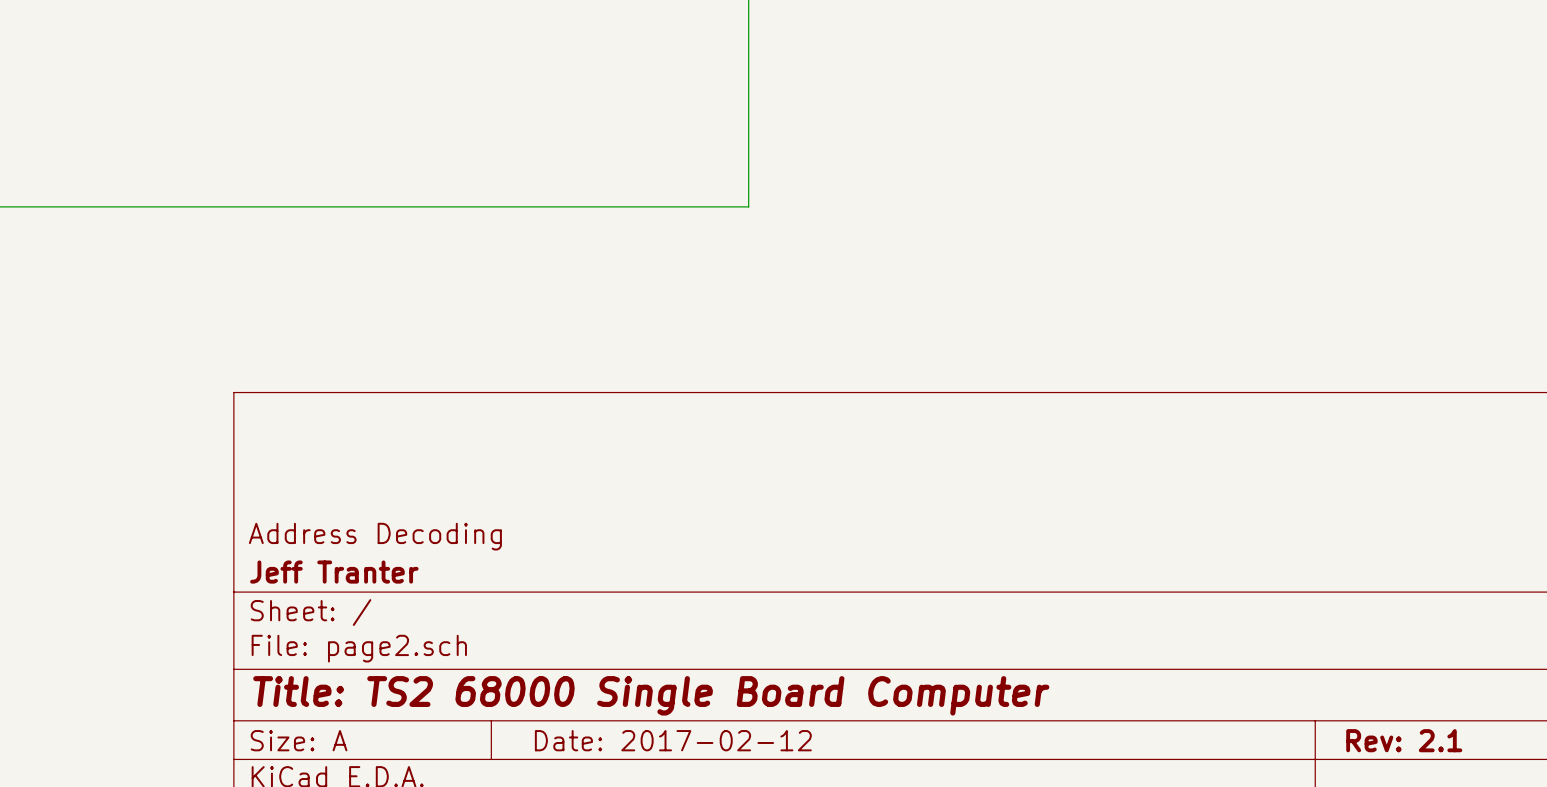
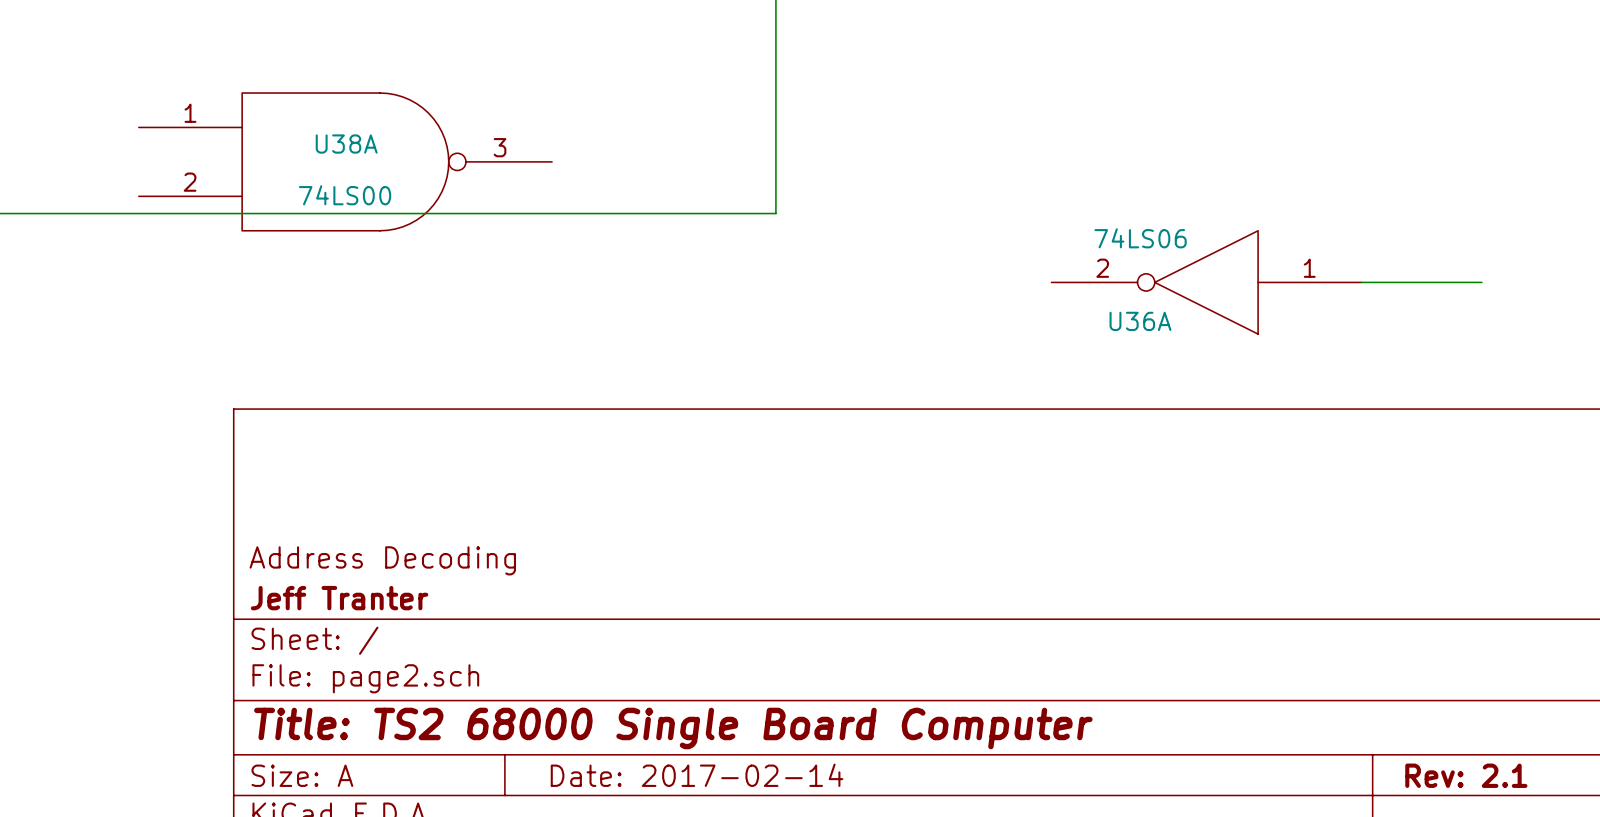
U38A: none -> 74LS00 (345, 161)
U36A: none -> 74LS06 (1206, 282)
wire: none -> (1361, 282) (1481, 282)
title block: Date: 2017-02-12 (673, 740) -> Date: 2017-02-14 (697, 775)

